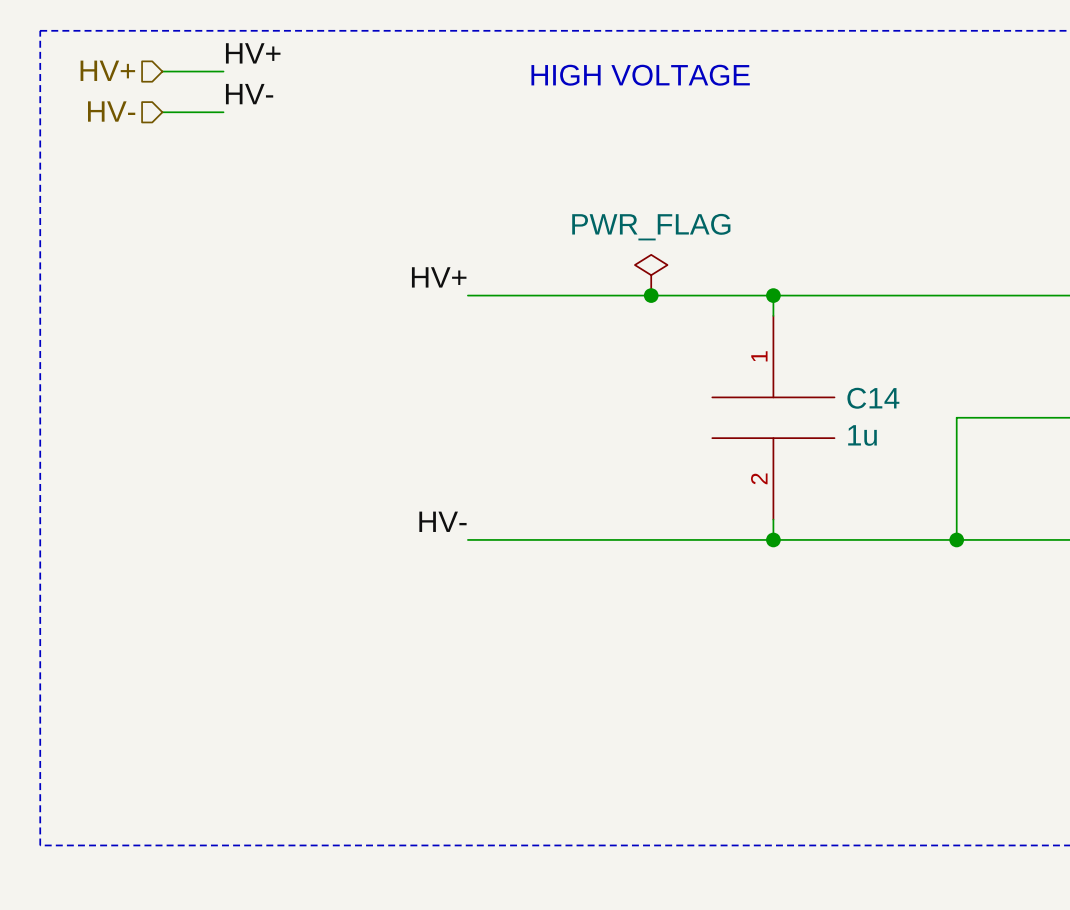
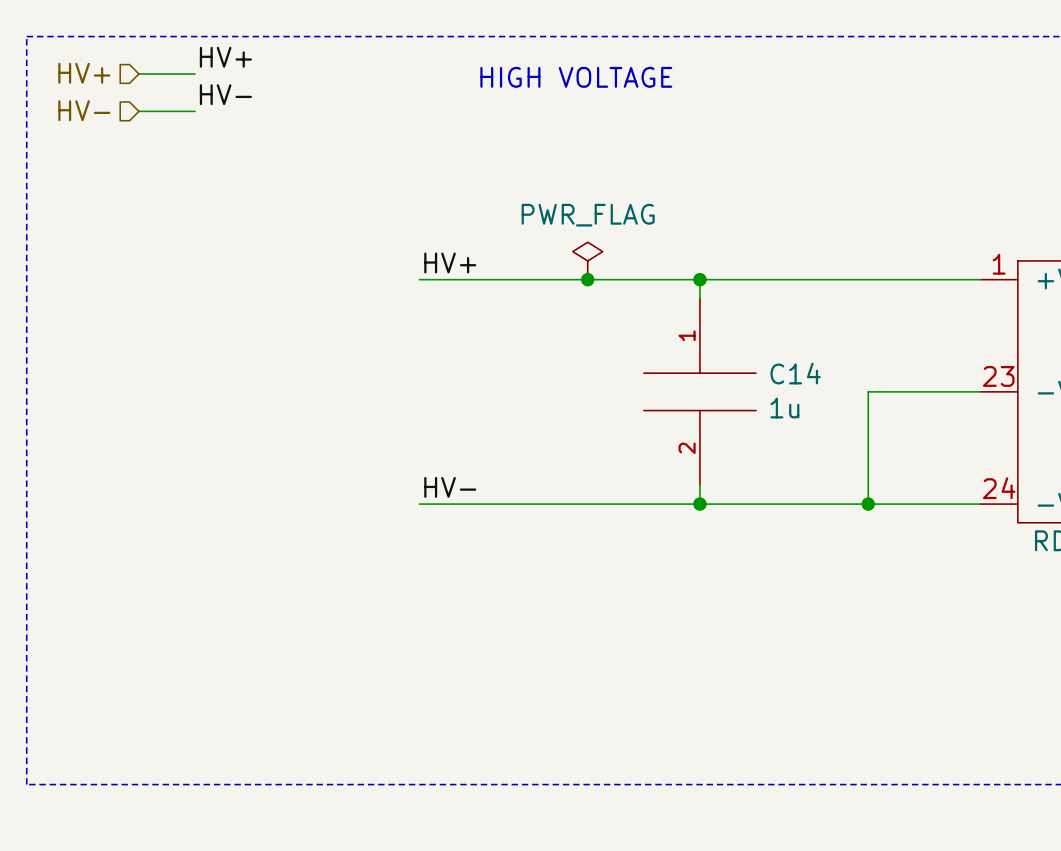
label position: HV+ (439, 277) -> HV+ (450, 262)
label position: HV- (442, 521) -> HV- (450, 487)

